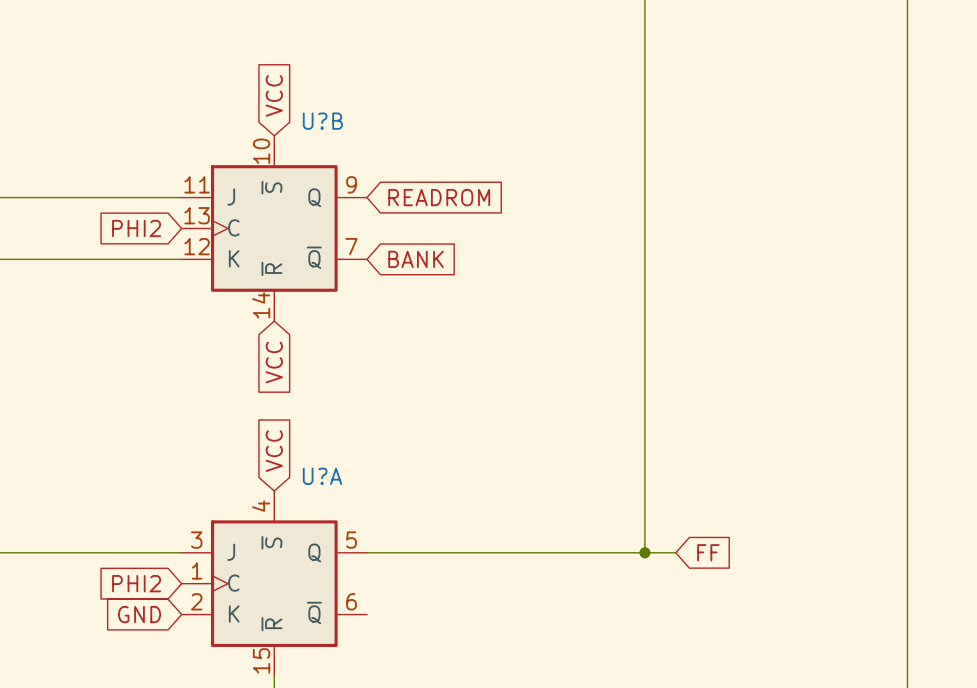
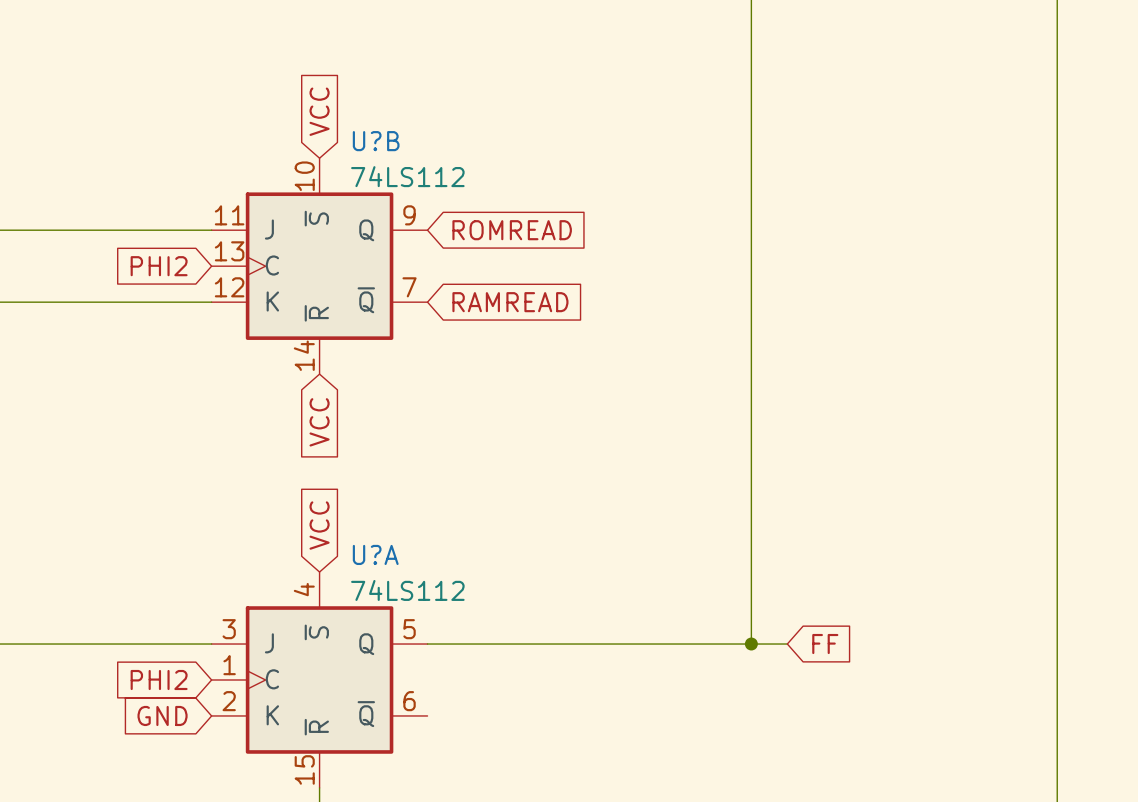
U?B value: none -> 74LS112 (407, 176)
global label: READROM (439, 197) -> ROMREAD (512, 230)
global label: BANK (416, 259) -> RAMREAD (510, 302)
U?A value: none -> 74LS112 (407, 590)

